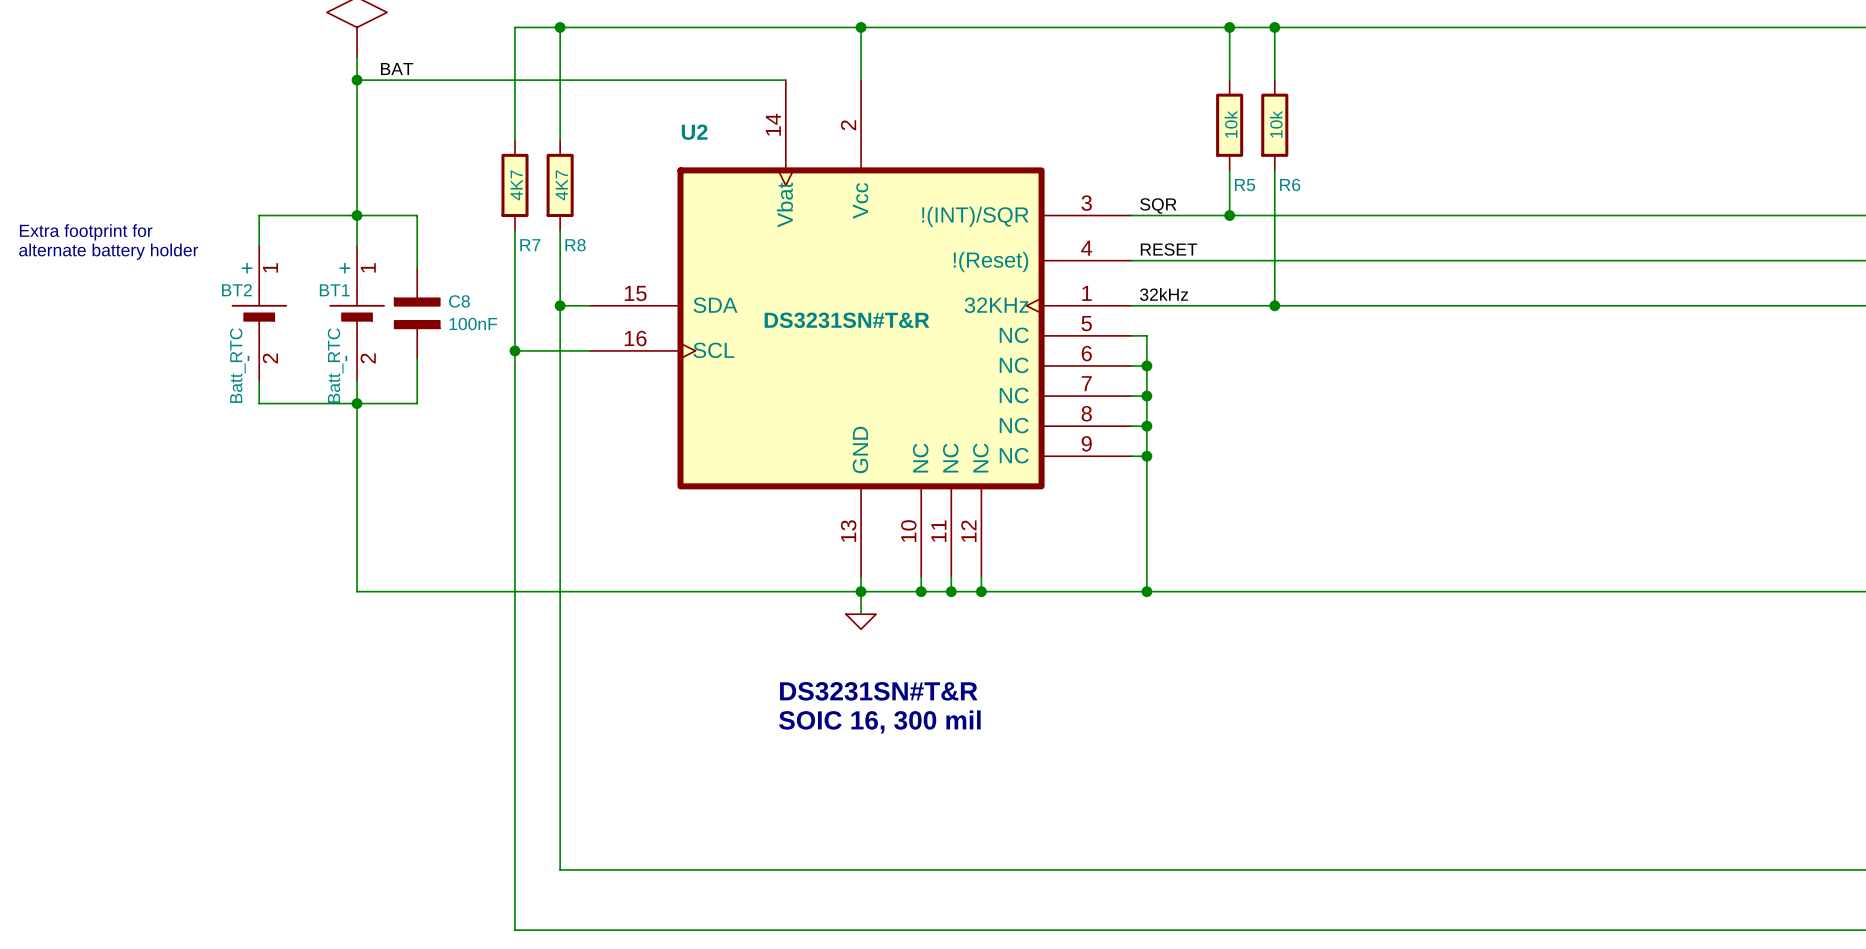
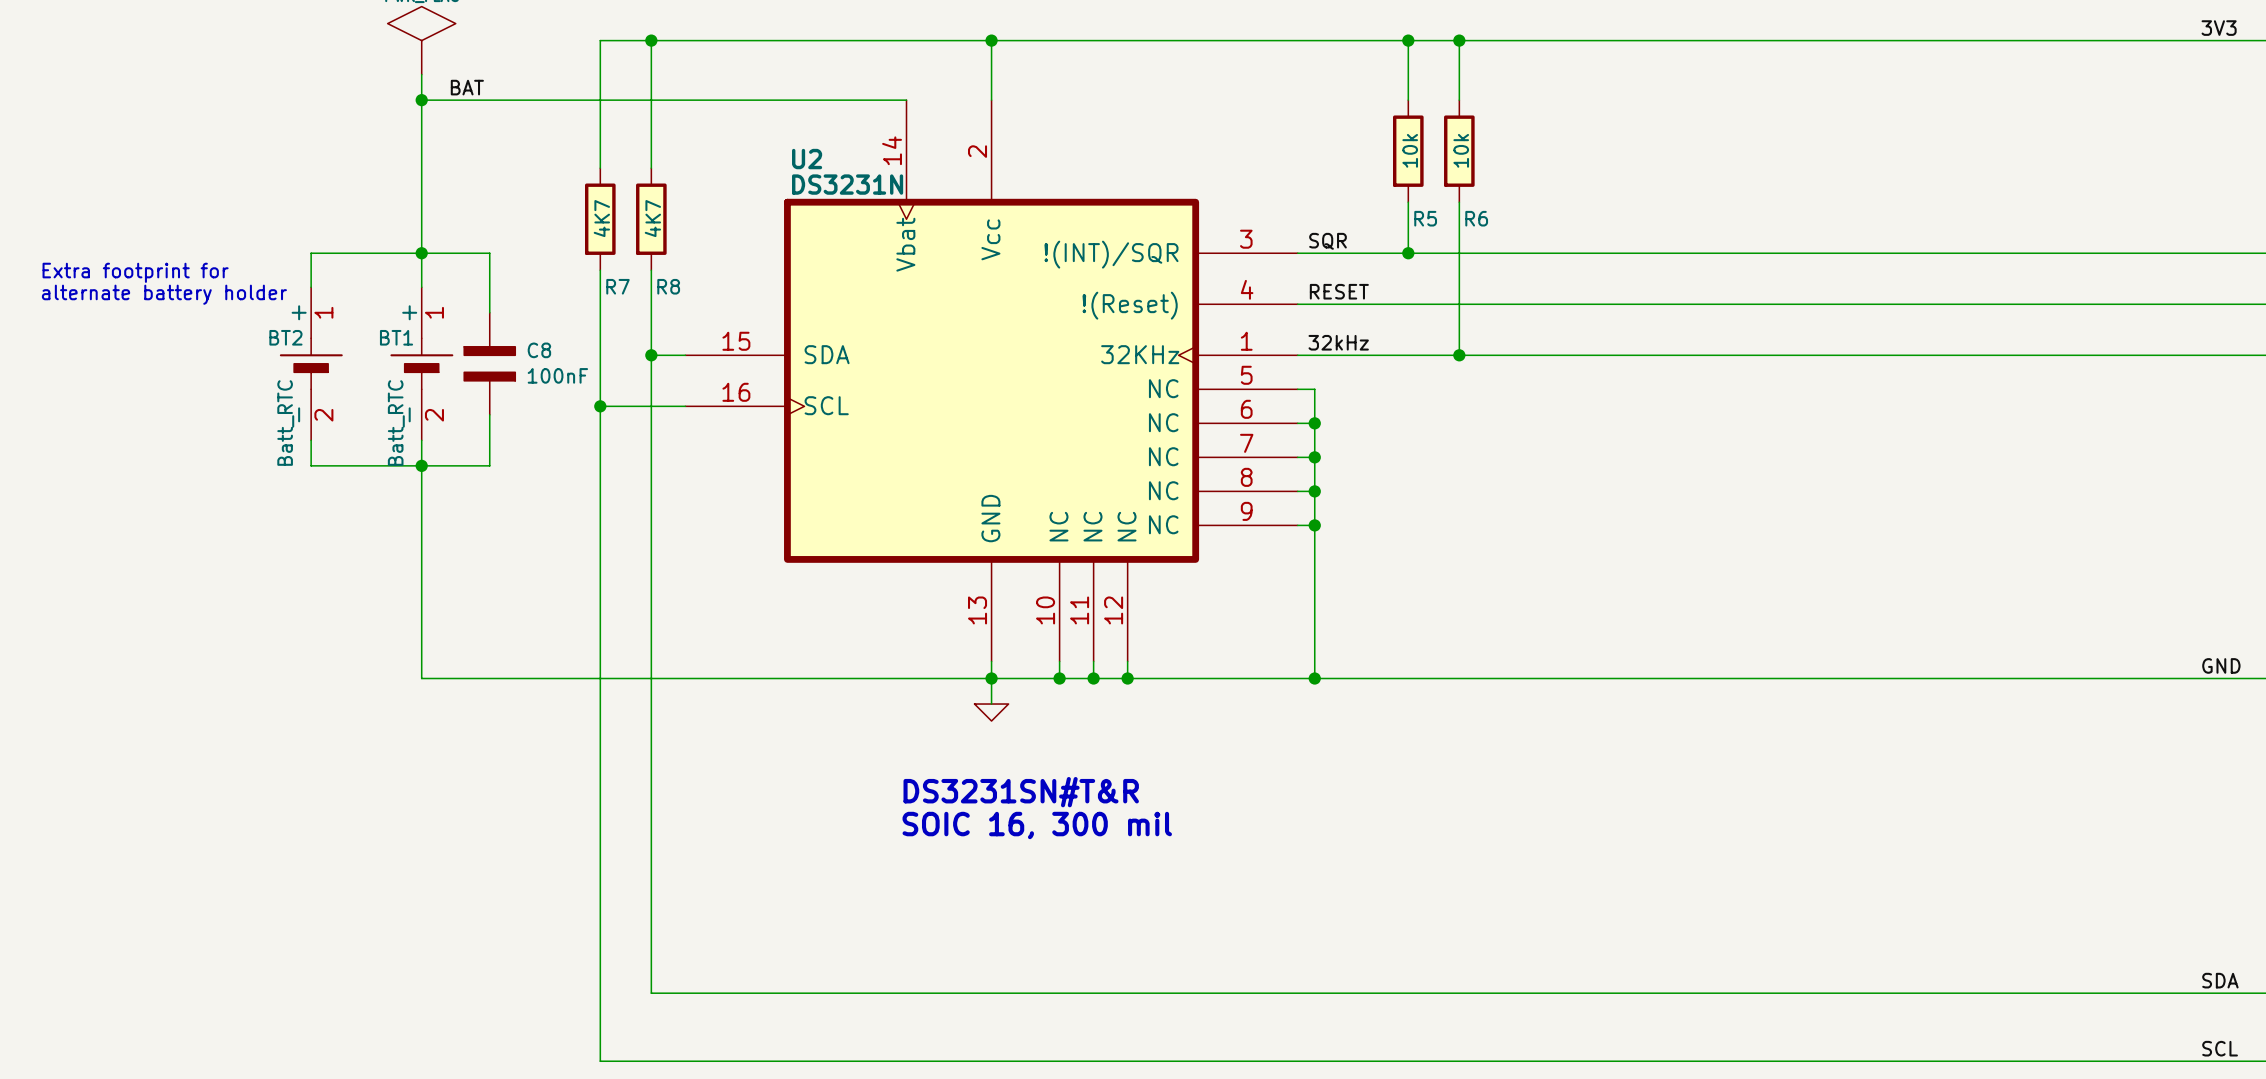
U2 value: DS3231SN#T&R (847, 320) -> DS3231N (847, 184)

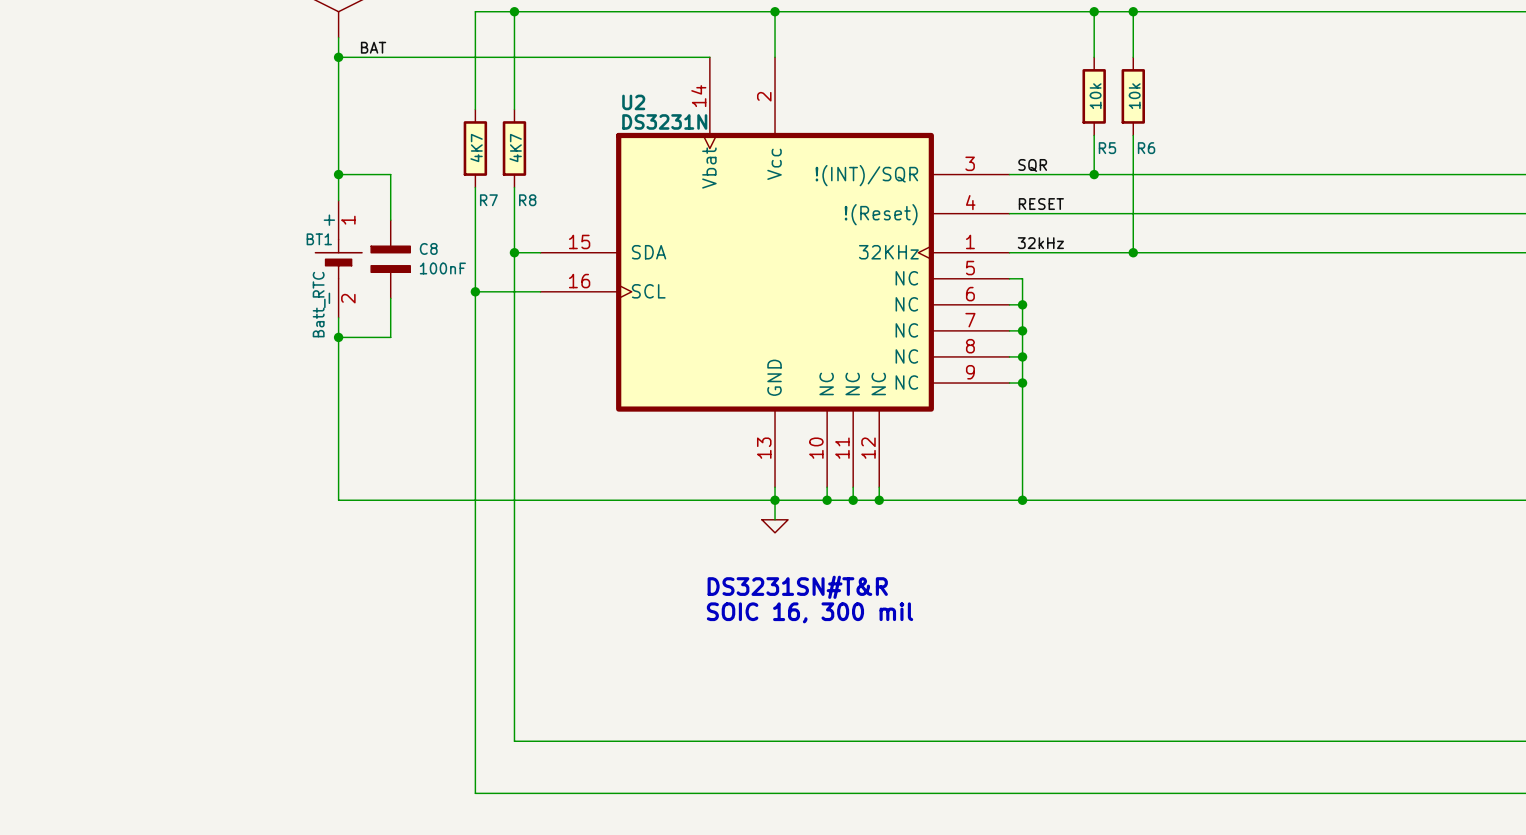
wire: (421, 253) (311, 253) (311, 287) -> none
text: Extra footprint for (135, 272) -> none
text: alternate battery holder (164, 294) -> none
BT2: Batt_RTC (311, 363) -> none
wire: (311, 440) (311, 465) (421, 465) -> none

